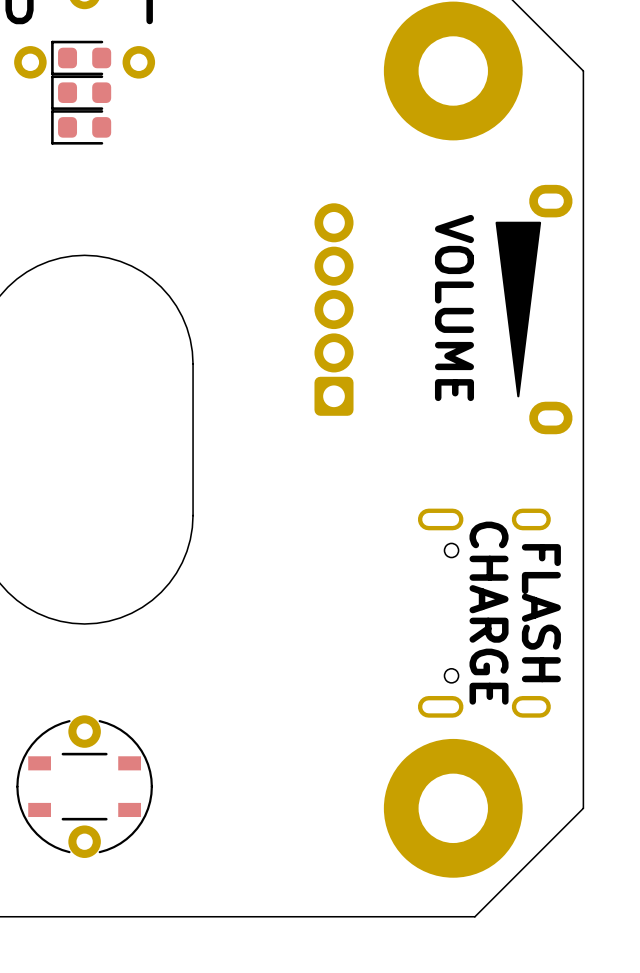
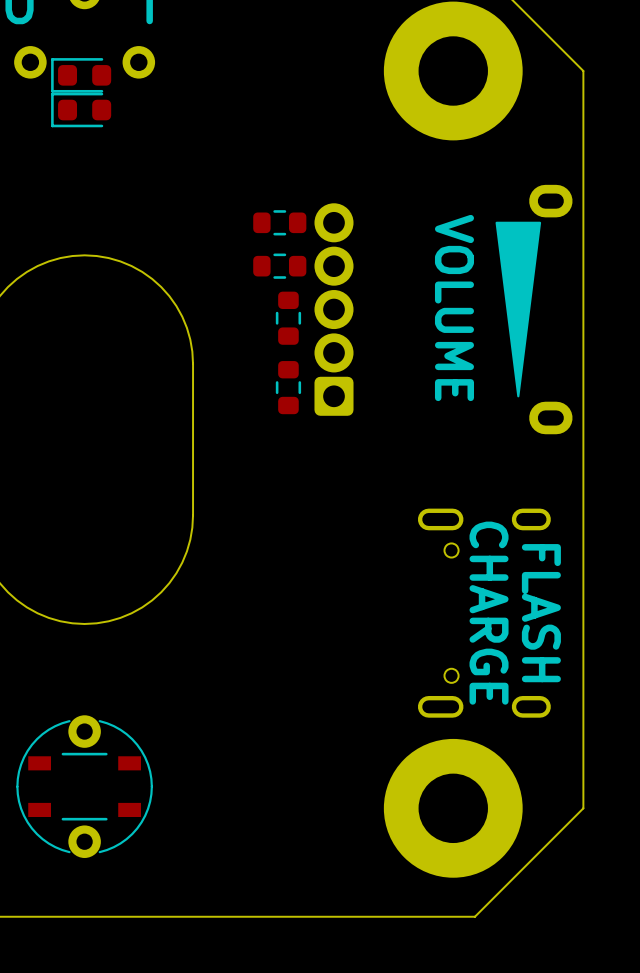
part: (81, 57) -> none
part: none -> (81, 75)
part: (81, 92) -> none
part: none -> (81, 110)
part: (81, 127) -> none
part: none -> (279, 222)
part: none -> (279, 266)
part: none -> (288, 318)
part: none -> (288, 387)

